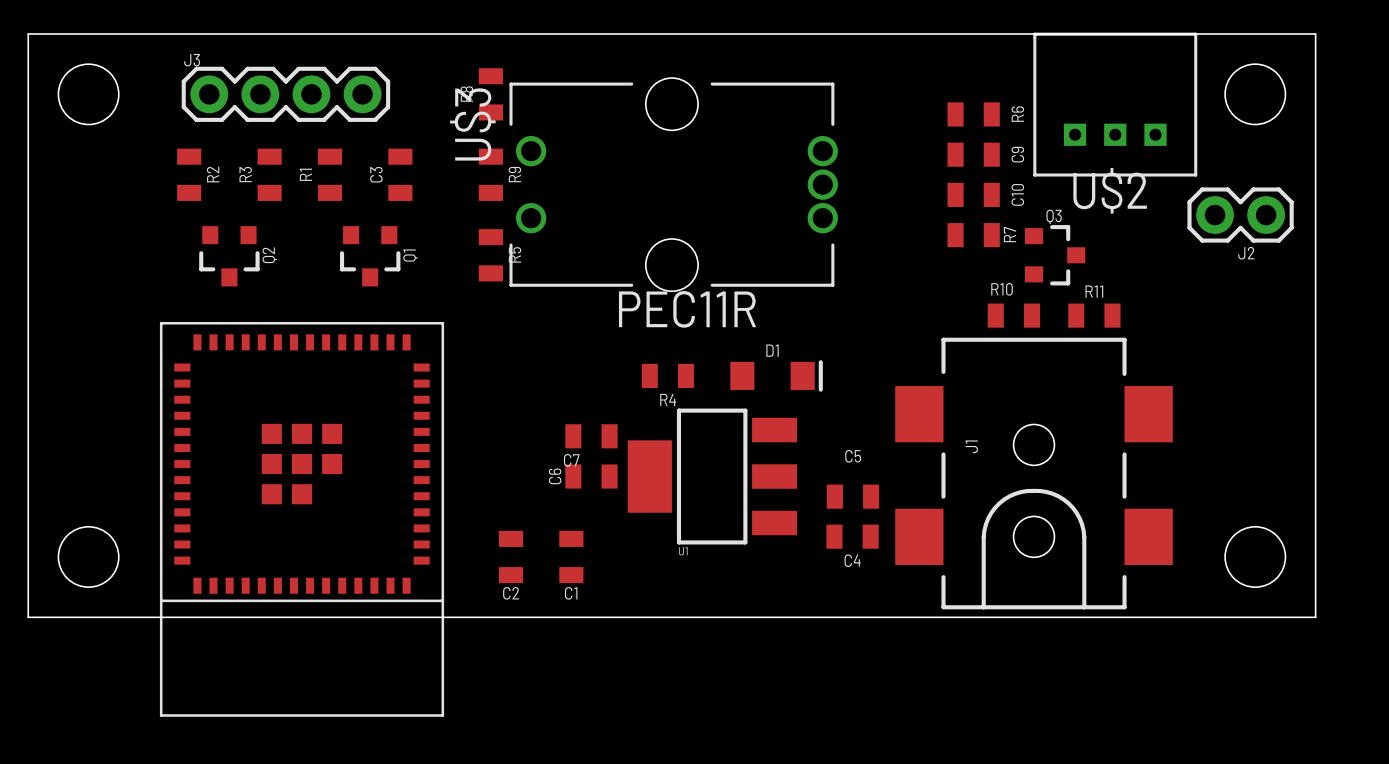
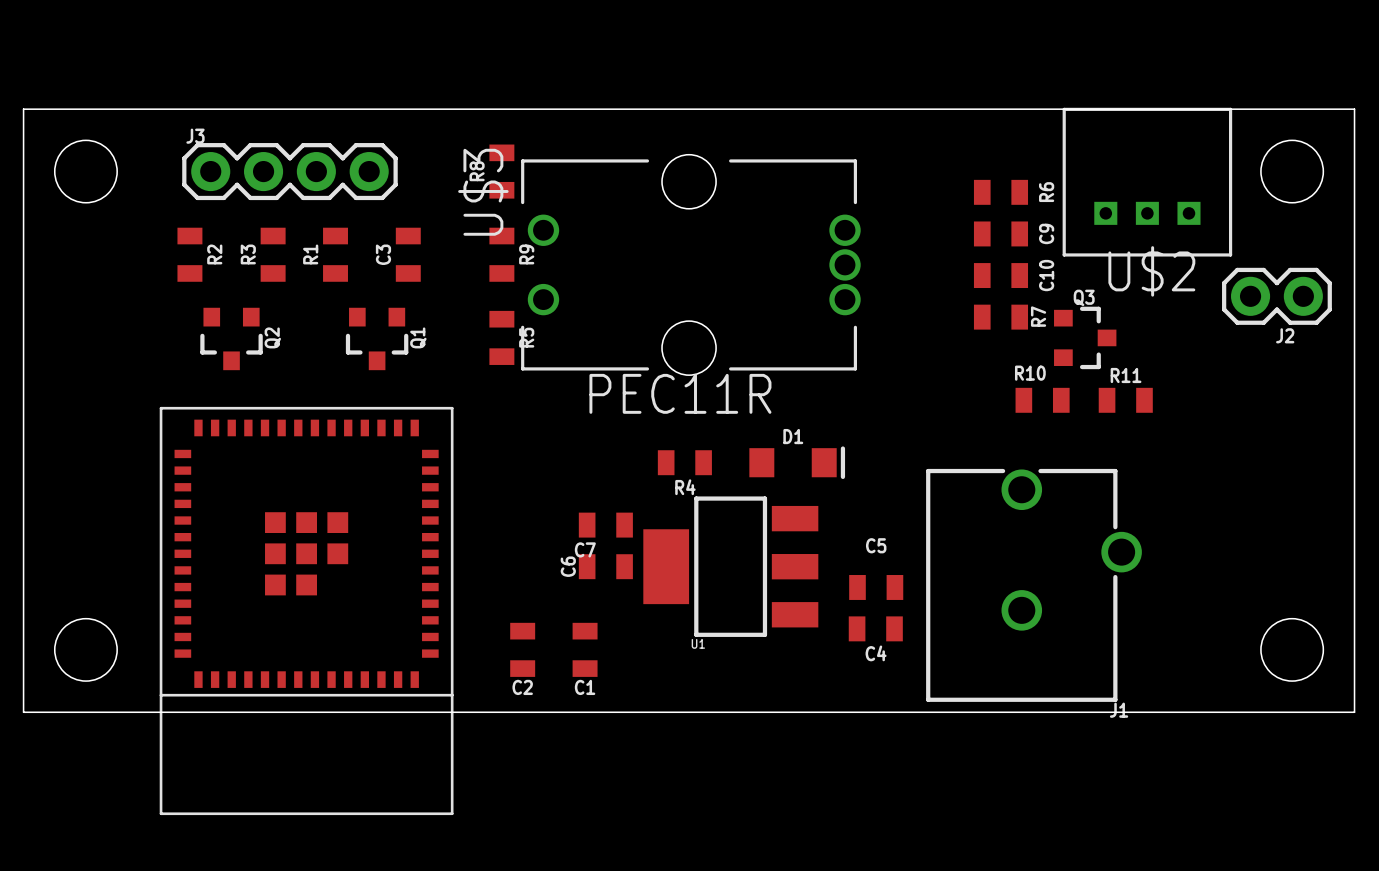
J1 footprint: [895, 337, 1173, 610] -> [926, 468, 1142, 702]
J1 name position: J1 (971, 446) -> J1 (1119, 710)

